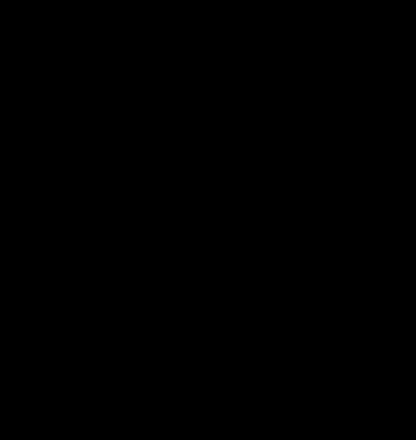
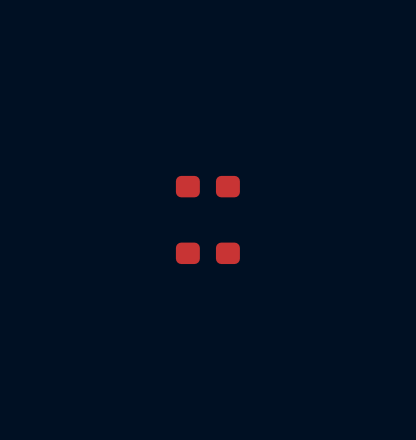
part: none -> (207, 186)
part: none -> (207, 253)

